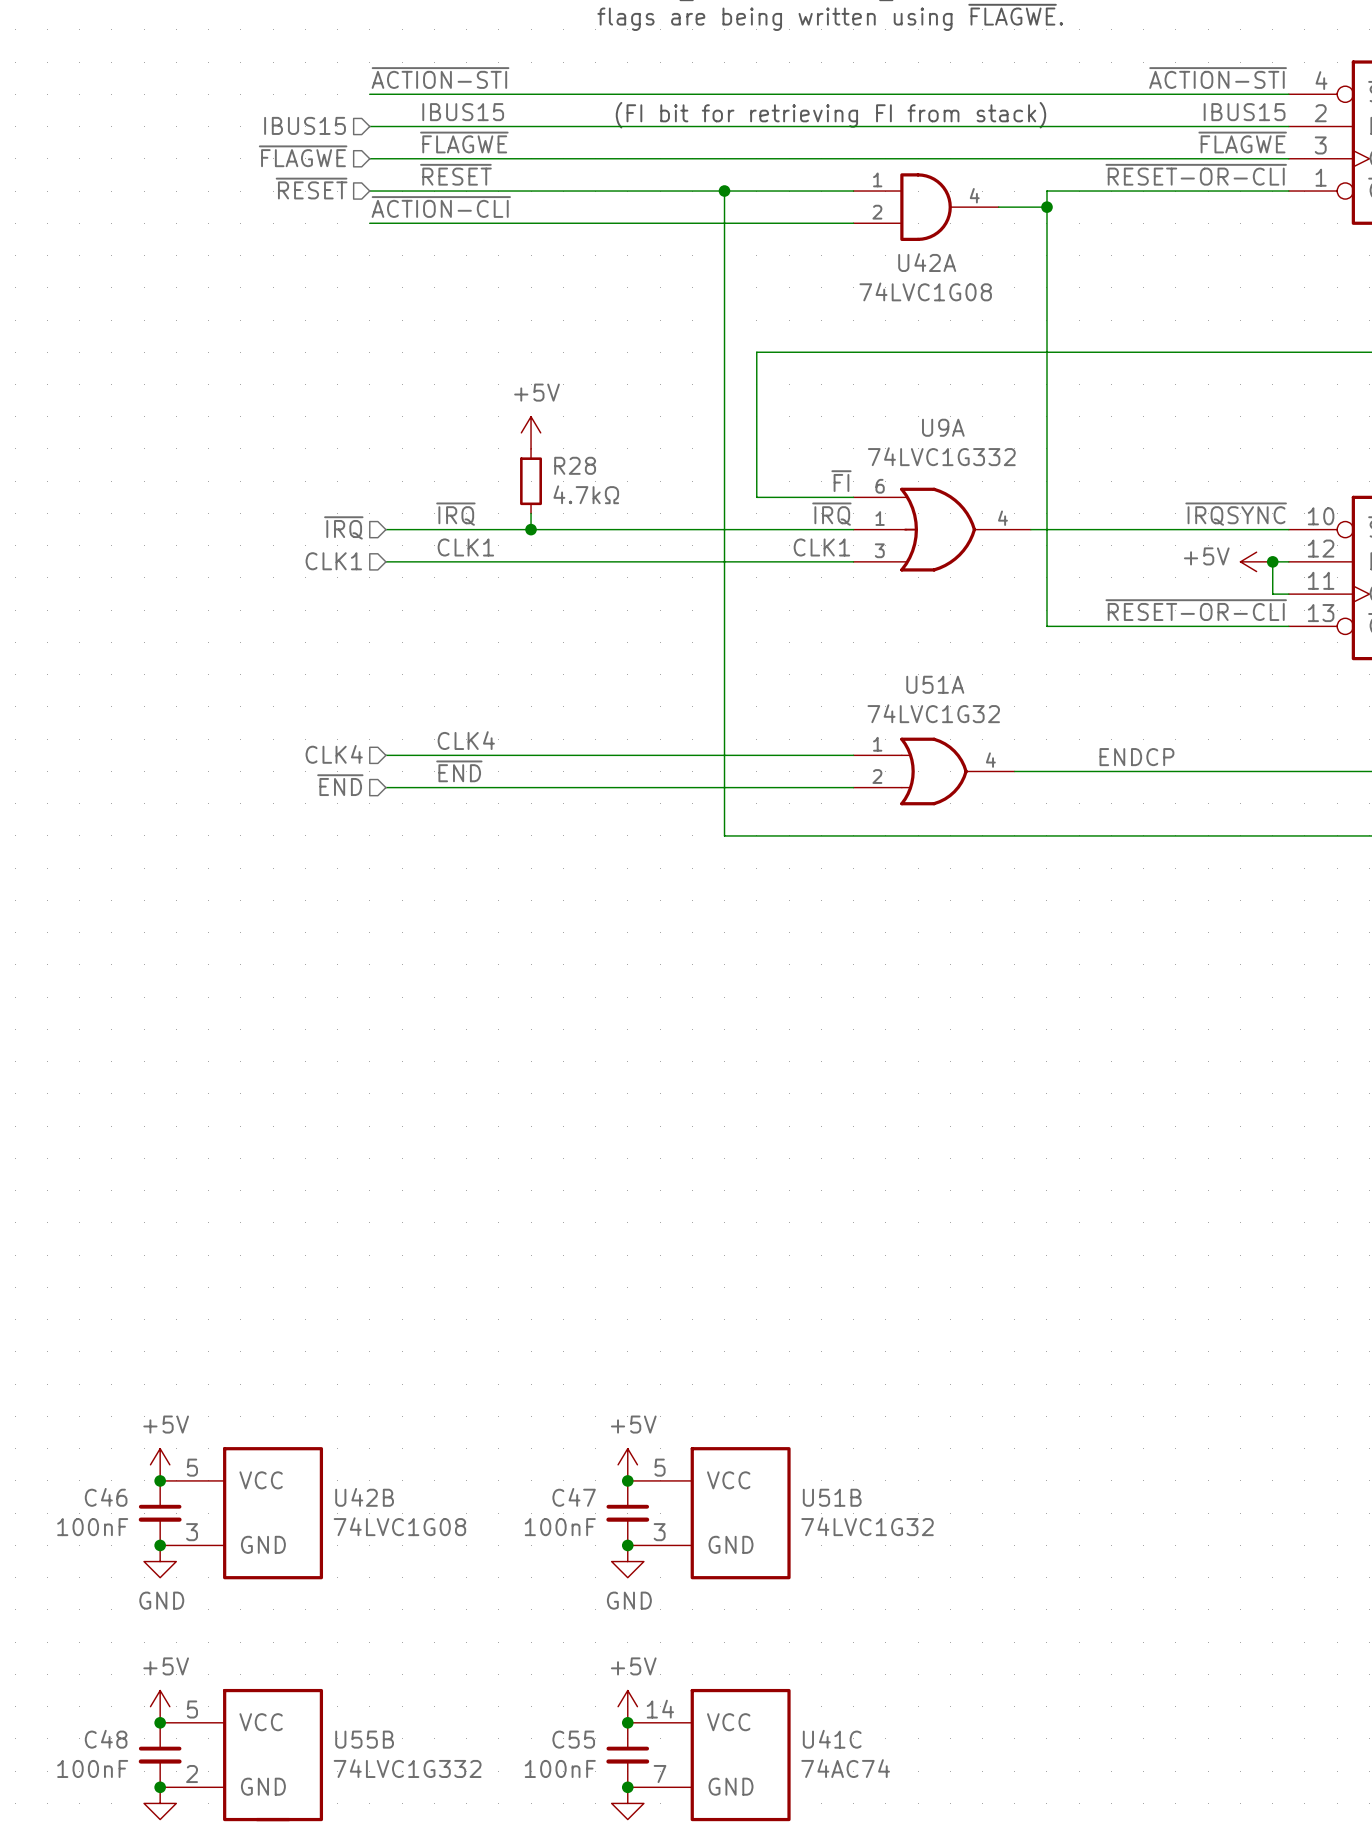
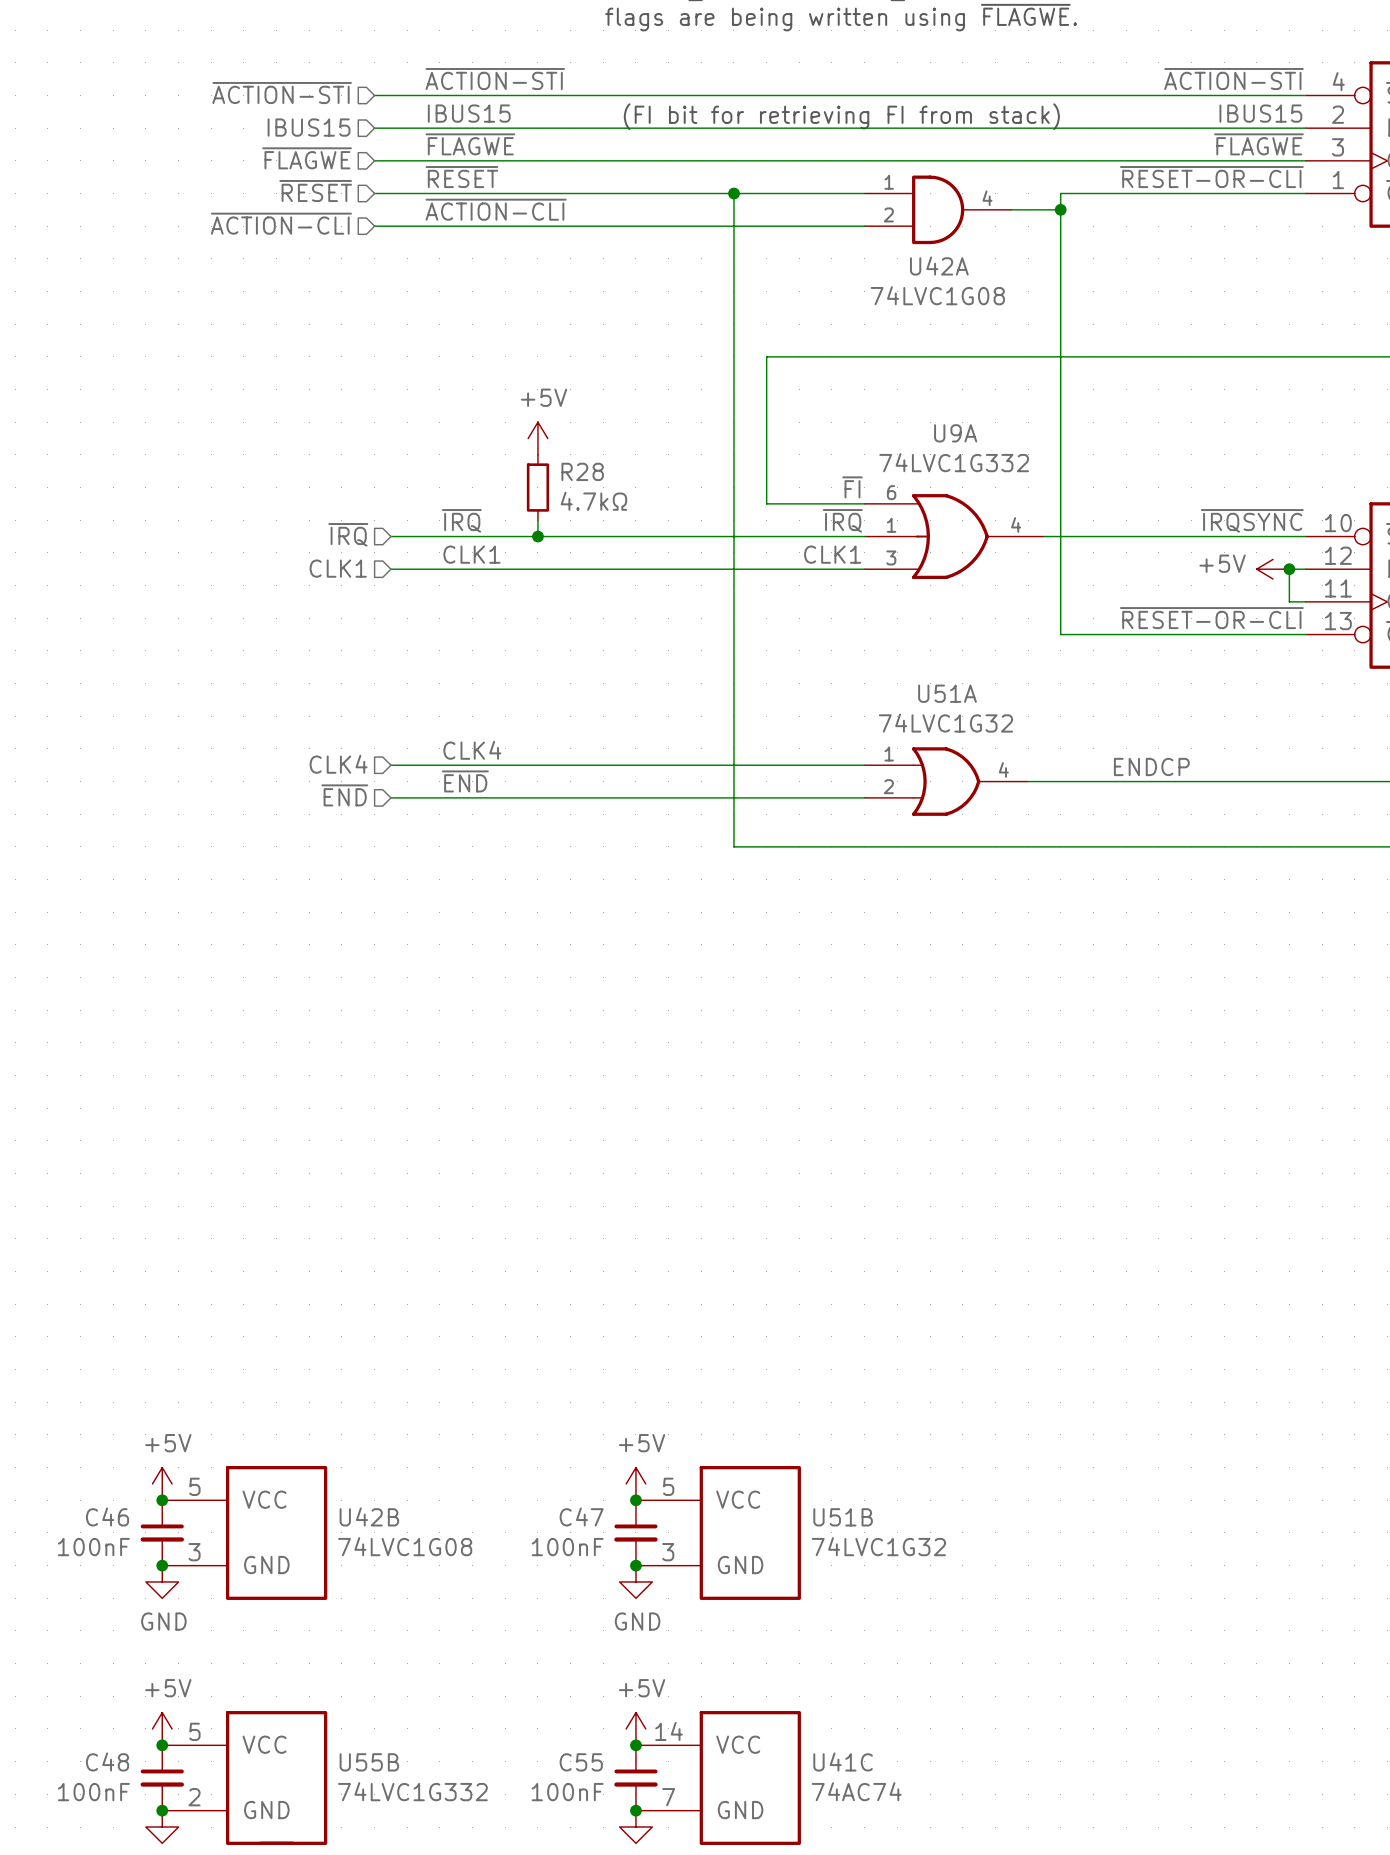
label position: ~{ACTION-STI} (440, 78) -> ~{ACTION-STI} (495, 79)
hierarchical label: none -> ~{ACTION-STI} (282, 93)
label position: ~{ACTION-CLI} (441, 207) -> ~{ACTION-CLI} (496, 209)
hierarchical label: none -> ~{ACTION-CLI} (281, 223)

